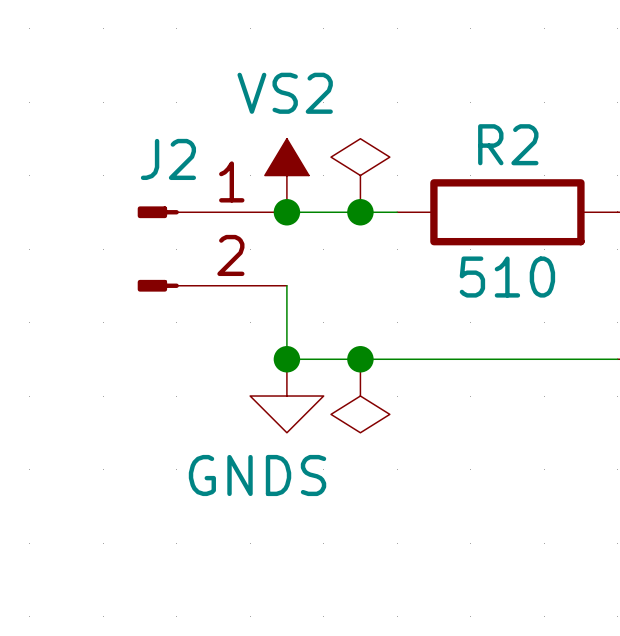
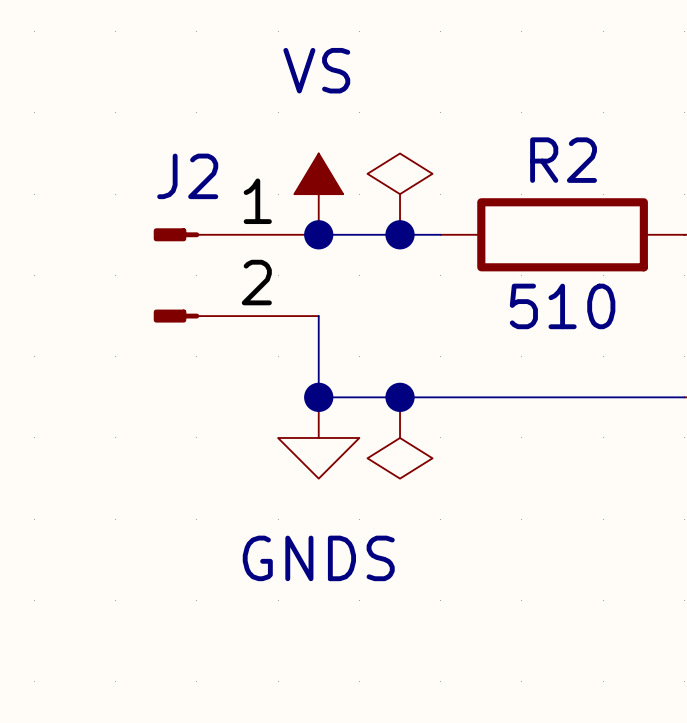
power symbol: VS2 (286, 175) -> VS (318, 194)
power symbol text position: GNDS (257, 475) -> GNDS (318, 558)

